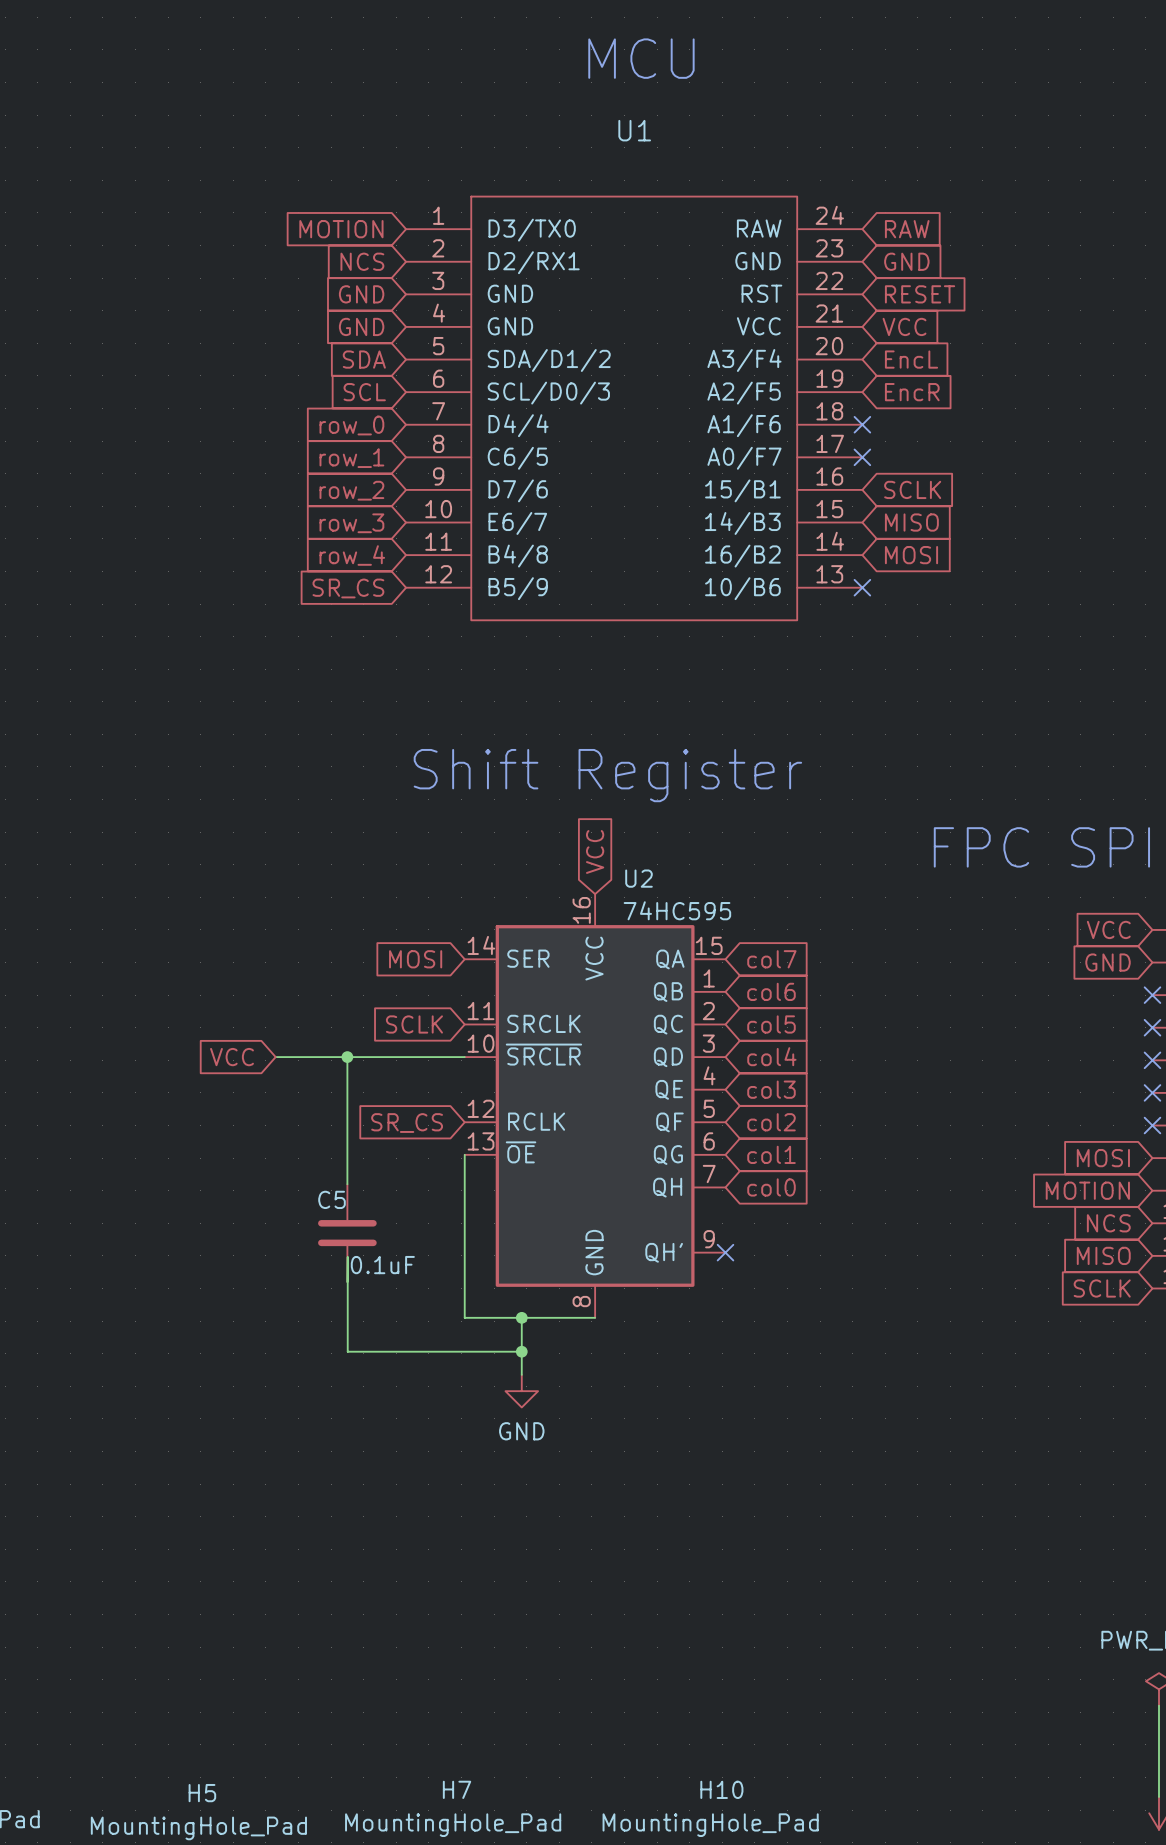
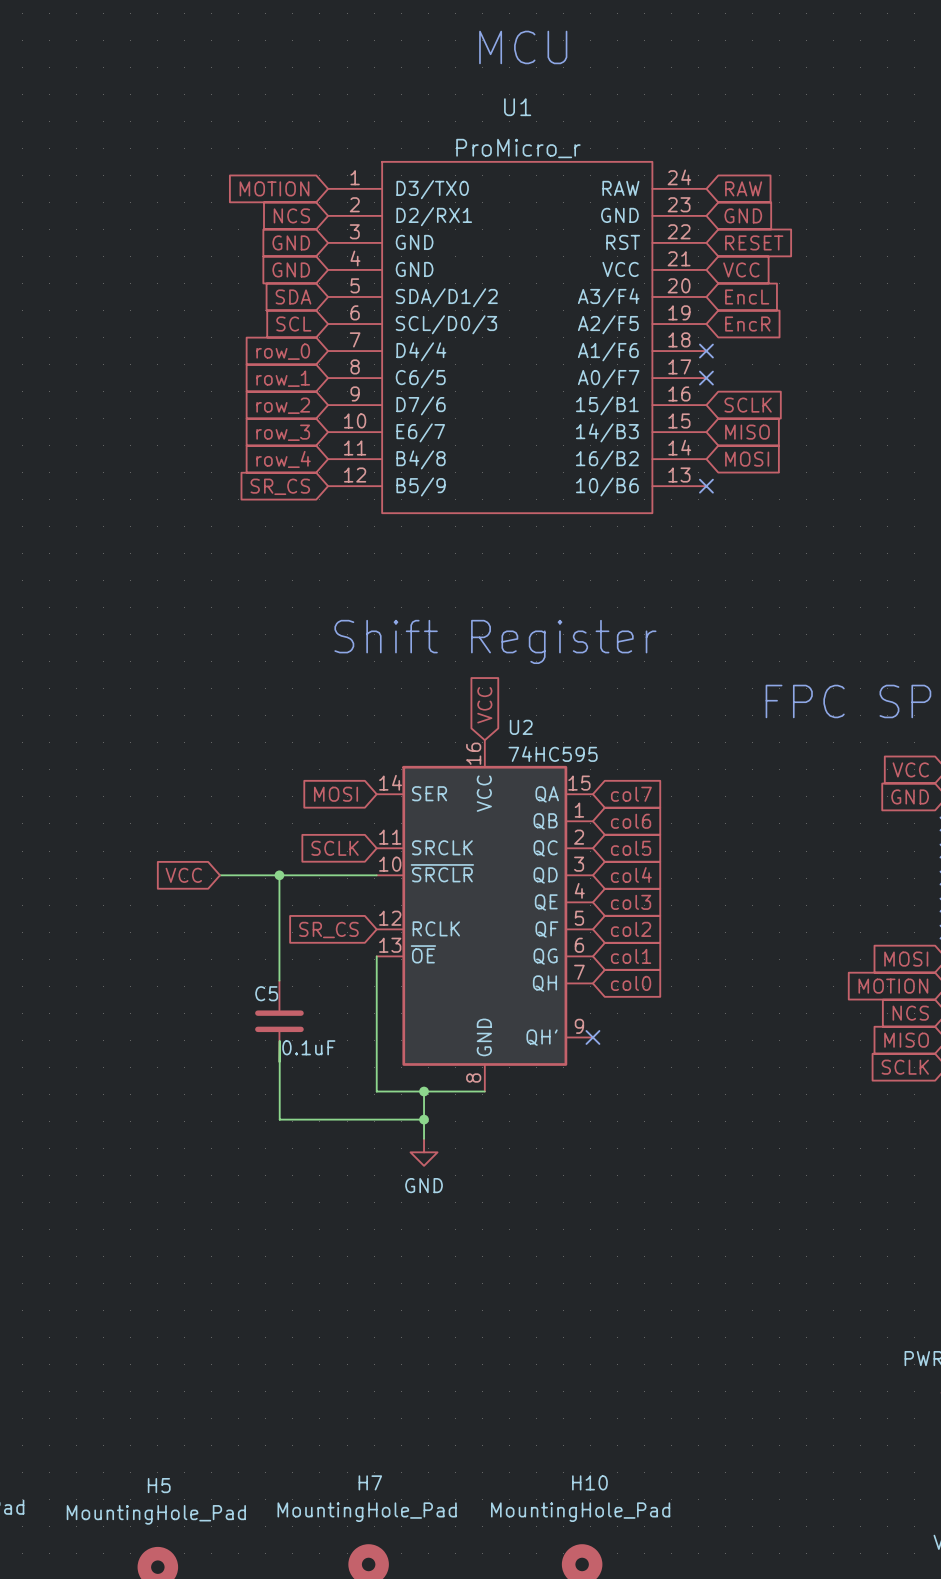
U1 value: none -> ProMicro_r (518, 148)

